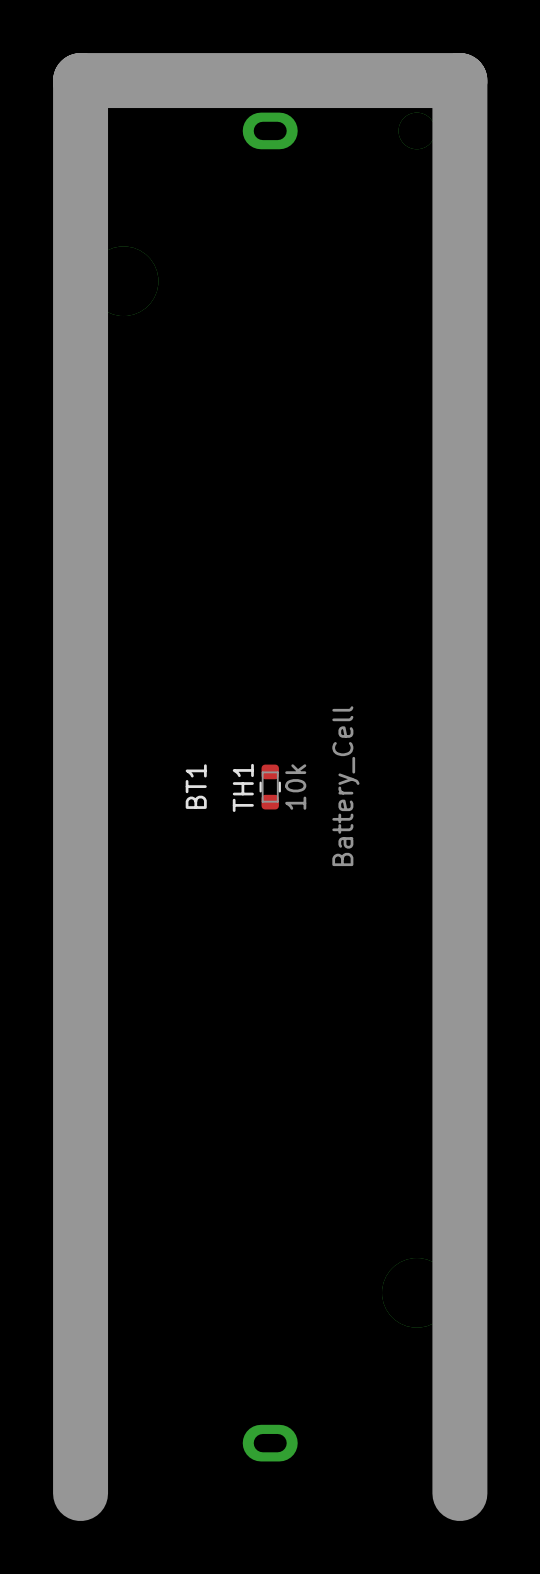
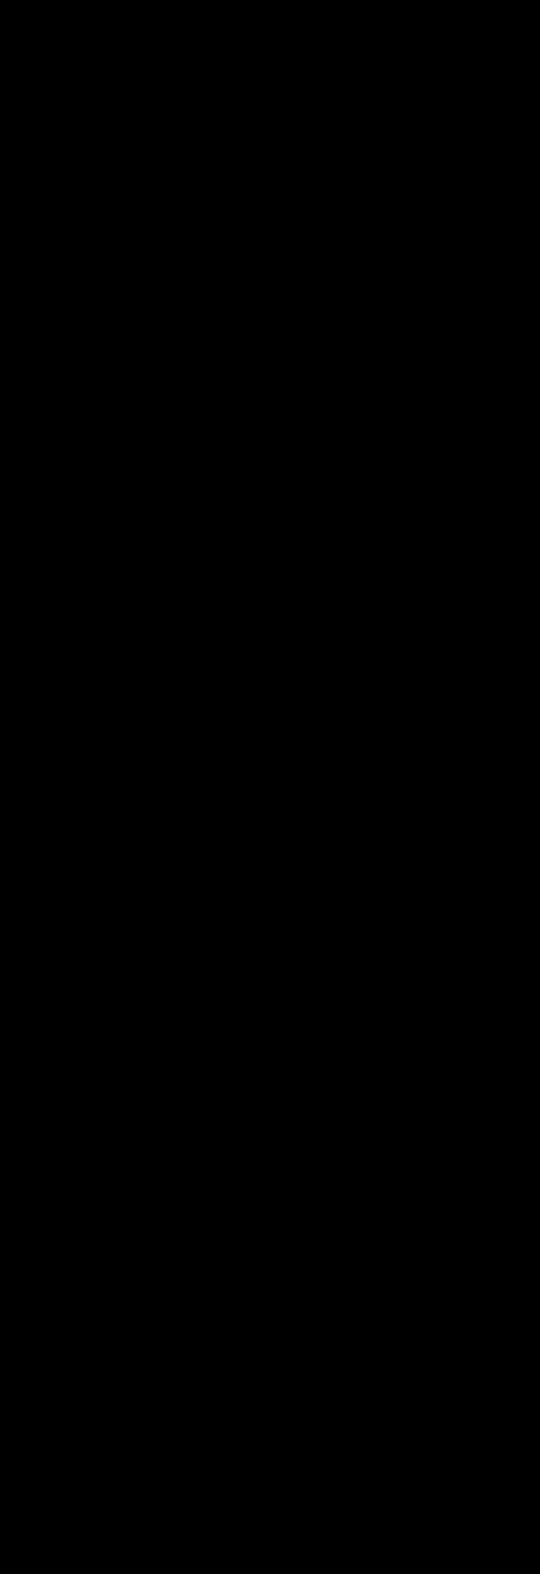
TH1: 10k (270, 787) -> none
BT1: Battery_Cell (270, 787) -> none

